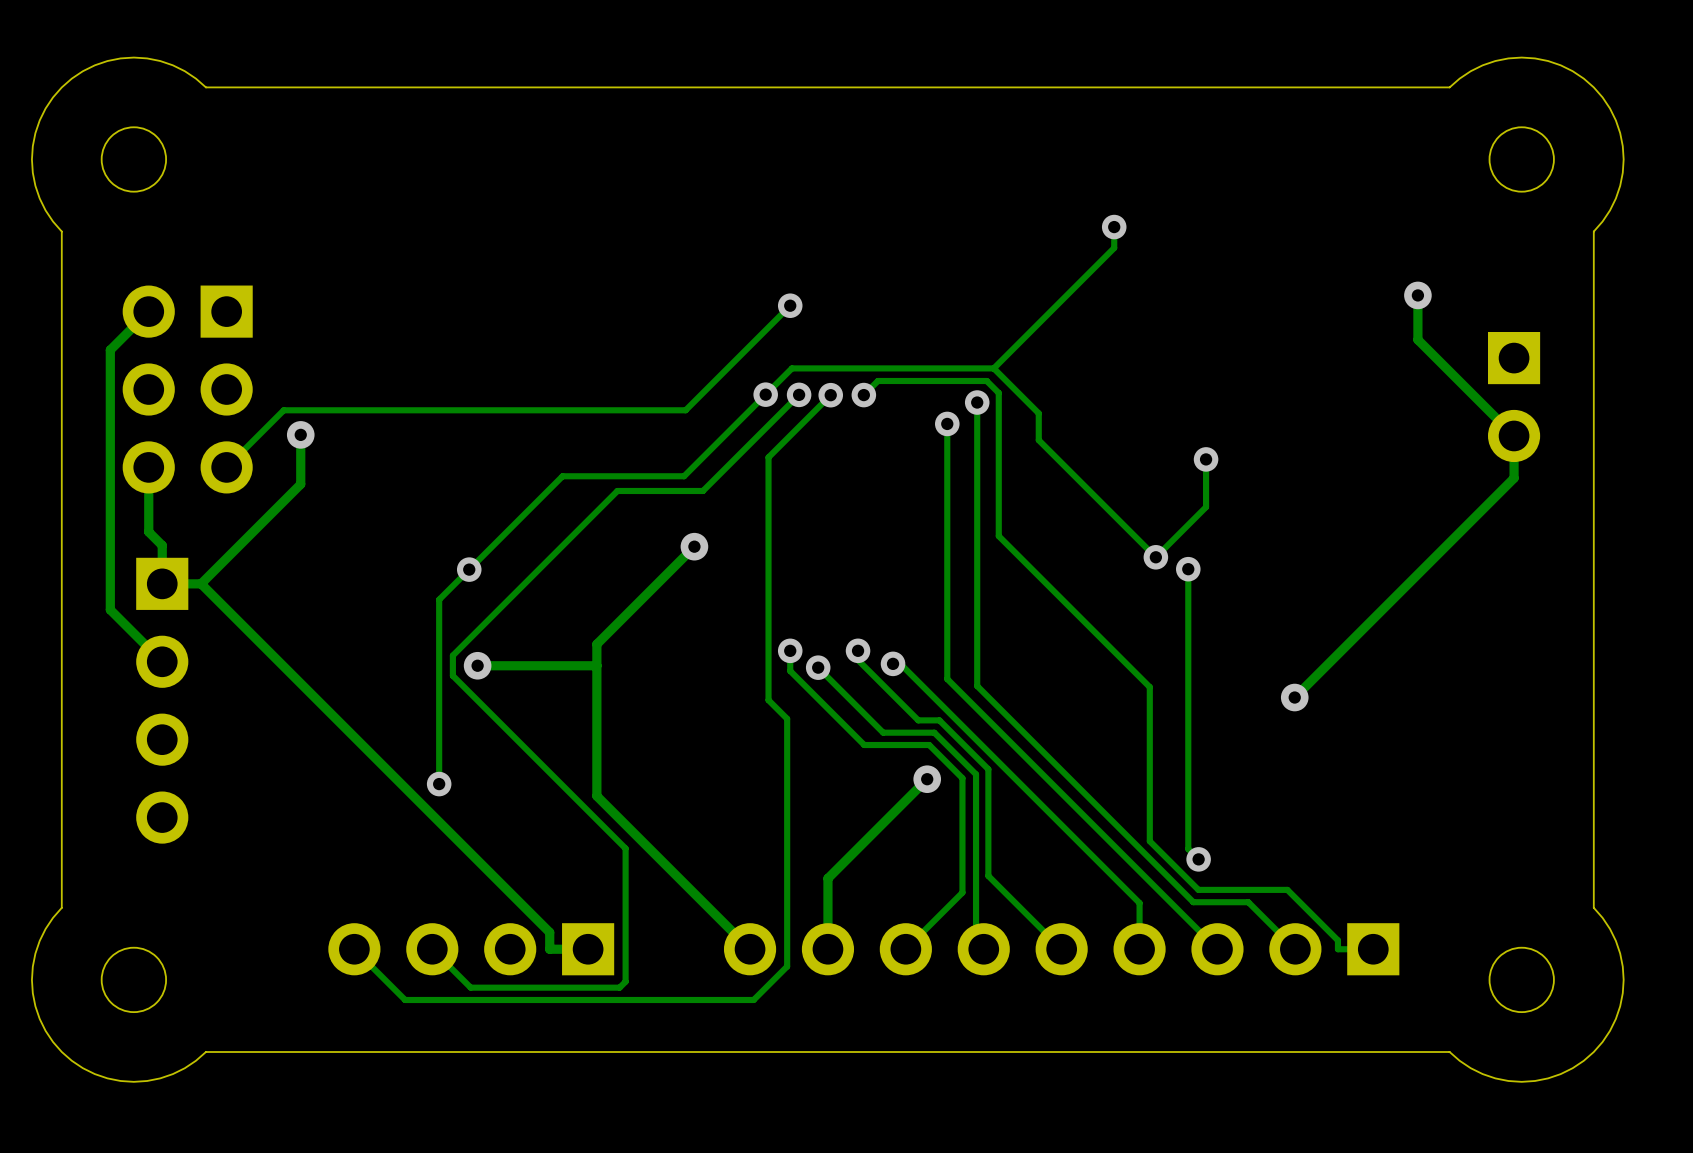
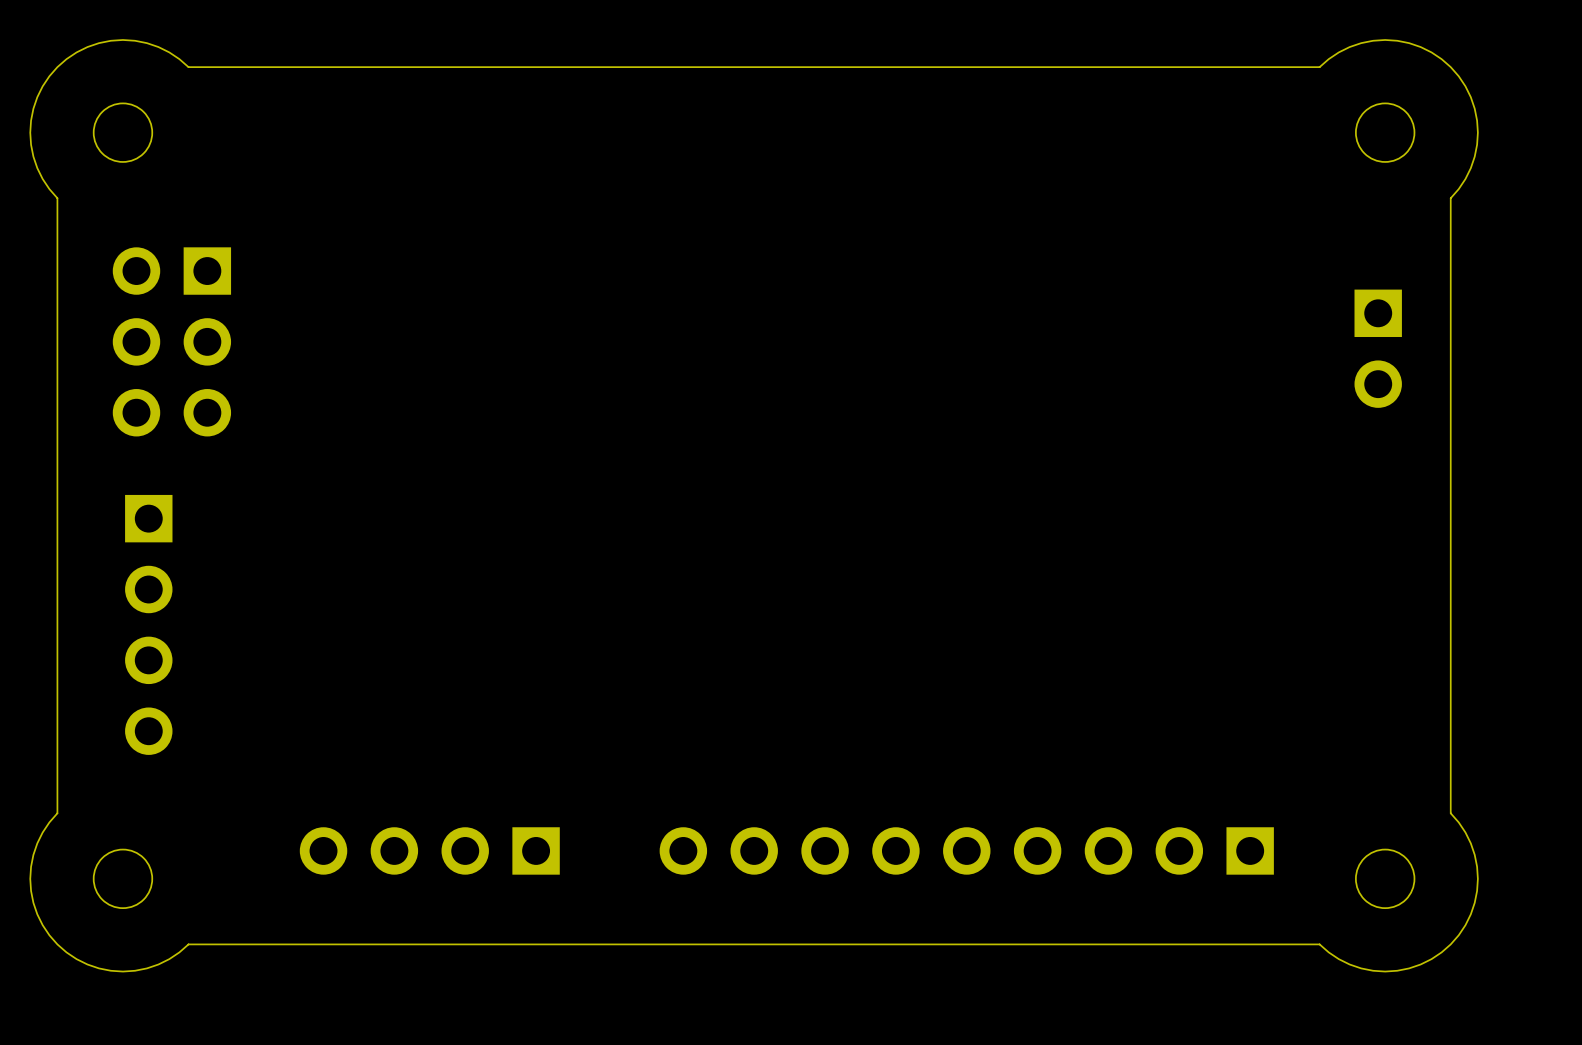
track: (1114, 227) (1114, 247) (993, 368) -> none
via: (1114, 227) -> none
track: (1417, 295) (1417, 339) (1514, 435) (1514, 478) (1294, 697) -> none
via: (1417, 295) -> none
track: (790, 305) (685, 410) (283, 410) (226, 467) -> none
via: (790, 305) -> none
track: (148, 311) (110, 350) (110, 609) (162, 661) -> none
track: (993, 368) (791, 368) (684, 476) (562, 476) (439, 599) (439, 784) -> none
track: (993, 368) (1038, 413) (1038, 440) (1155, 557) (1206, 507) (1206, 459) -> none
via: (765, 394) -> none
track: (799, 394) (702, 490) (617, 490) (452, 655) (452, 675) (625, 848) (625, 981) (619, 987) (470, 987) (432, 949) -> none
via: (799, 394) -> none
track: (830, 395) (768, 457) (768, 700) (787, 718) (787, 966) (753, 999) (405, 999) (354, 949) -> none
via: (830, 395) -> none
track: (863, 395) (877, 380) (986, 380) (998, 393) (998, 536) (1149, 687) (1149, 841) (1198, 889) (1287, 889) (1337, 940) (1337, 949) (1373, 949) -> none
via: (863, 395) -> none
track: (977, 402) (977, 686) (1193, 902) (1248, 902) (1295, 949) -> none
via: (977, 402) -> none
track: (947, 423) (947, 679) (1217, 949) -> none
via: (947, 423) -> none
track: (300, 434) (300, 484) (201, 583) -> none
via: (300, 434) -> none
via: (1206, 459) -> none
track: (148, 467) (148, 531) (162, 545) (162, 583) (201, 583) -> none
track: (694, 546) (596, 644) (596, 796) (750, 949) -> none
via: (694, 546) -> none
via: (1155, 557) -> none
via: (469, 569) -> none
track: (1188, 569) (1188, 849) (1198, 859) -> none
via: (1188, 569) -> none
track: (201, 583) (549, 932) (549, 949) (588, 949) -> none
track: (790, 650) (790, 670) (864, 745) (929, 745) (962, 778) (962, 892) (905, 949) -> none
via: (790, 650) -> none
track: (858, 650) (858, 660) (918, 720) (939, 720) (988, 769) (988, 875) (1061, 949) -> none
via: (858, 650) -> none
track: (893, 663) (900, 663) (1139, 903) (1139, 949) -> none
via: (893, 663) -> none
via: (477, 665) -> none
track: (596, 665) (477, 665) -> none
track: (818, 667) (883, 732) (934, 732) (976, 774) (976, 941) (983, 949) -> none
via: (818, 667) -> none
via: (1294, 697) -> none
track: (927, 779) (827, 878) (827, 949) -> none
via: (927, 779) -> none
via: (439, 784) -> none
via: (1198, 859) -> none

